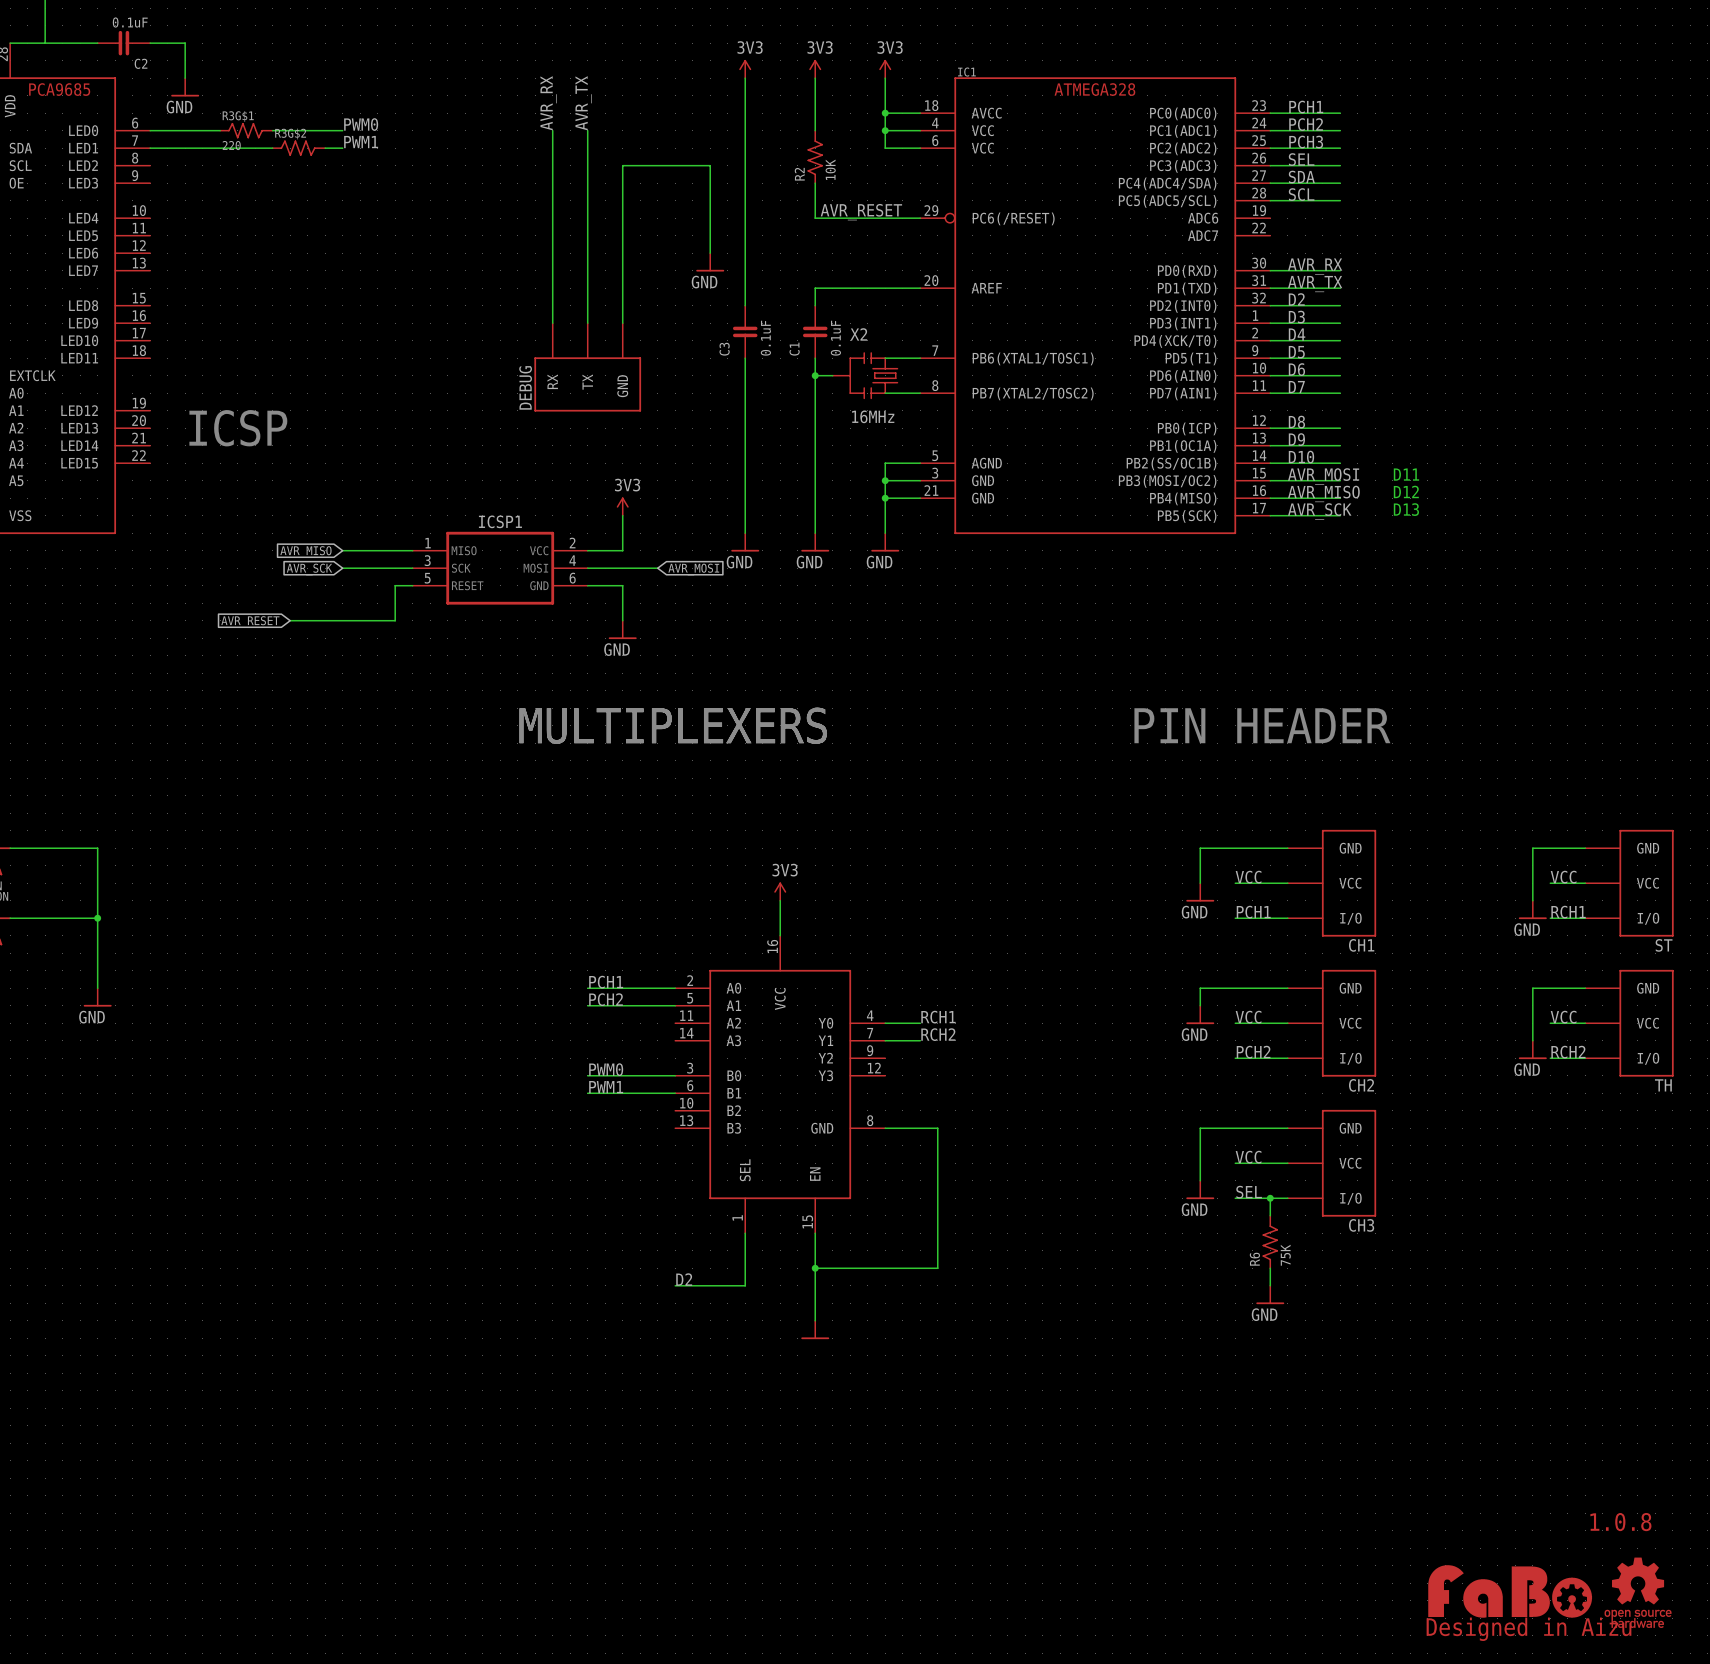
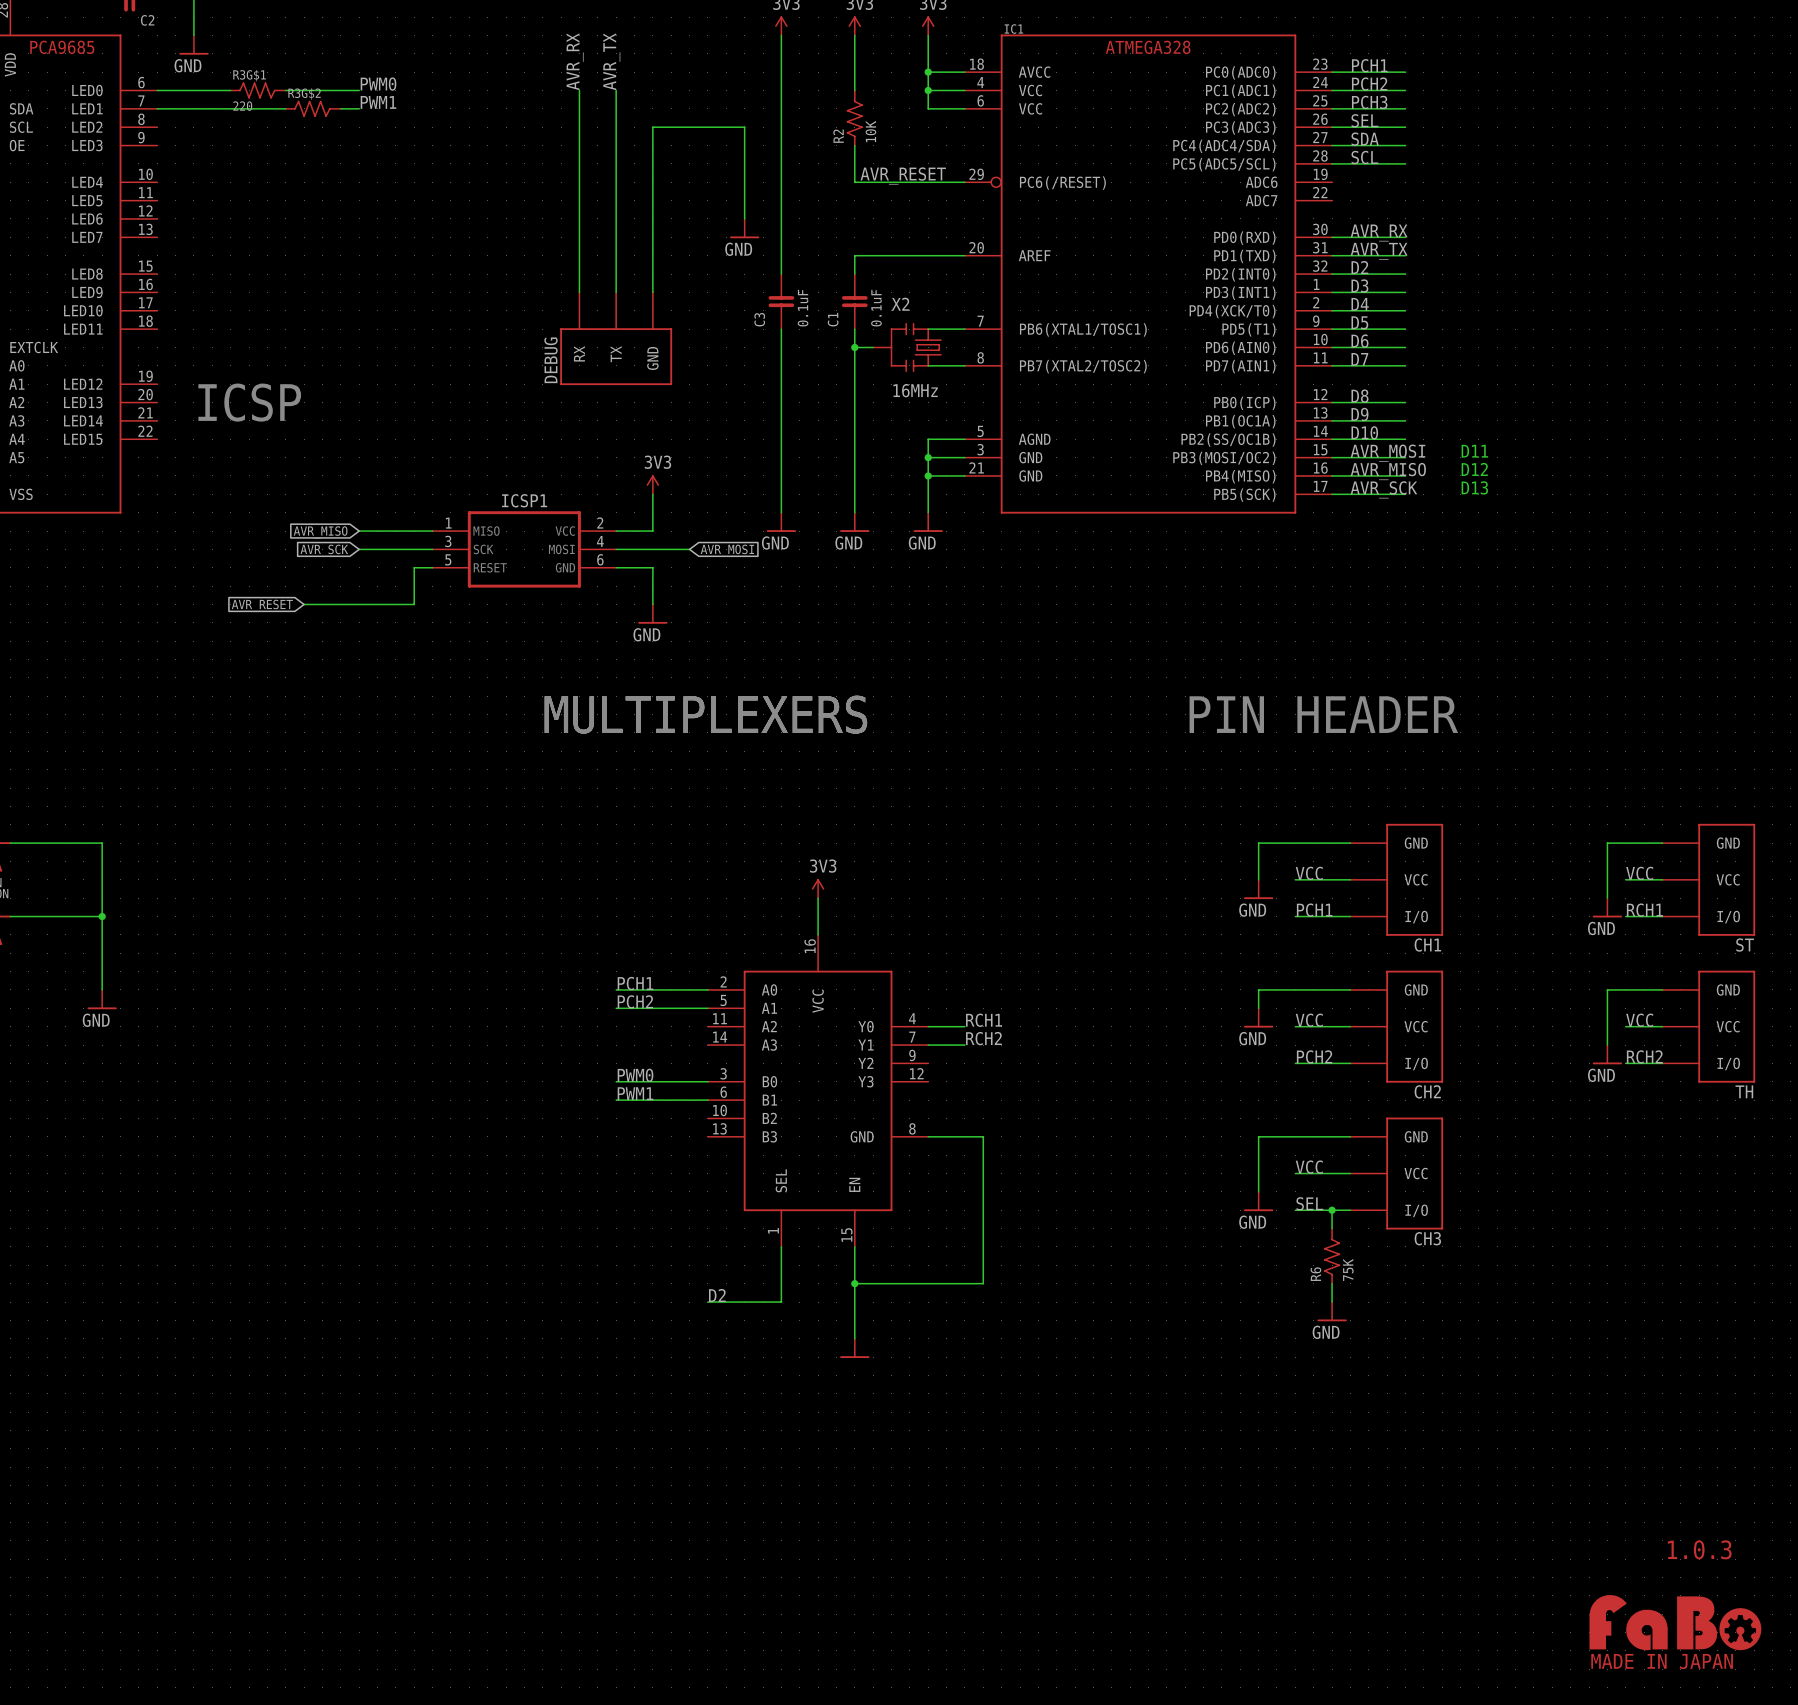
text: 1.0.8 (1620, 1522) -> 1.0.3 (1699, 1549)
part: (1510, 1591) -> none
part: none -> (1675, 1622)
part: (1638, 1592) -> none

